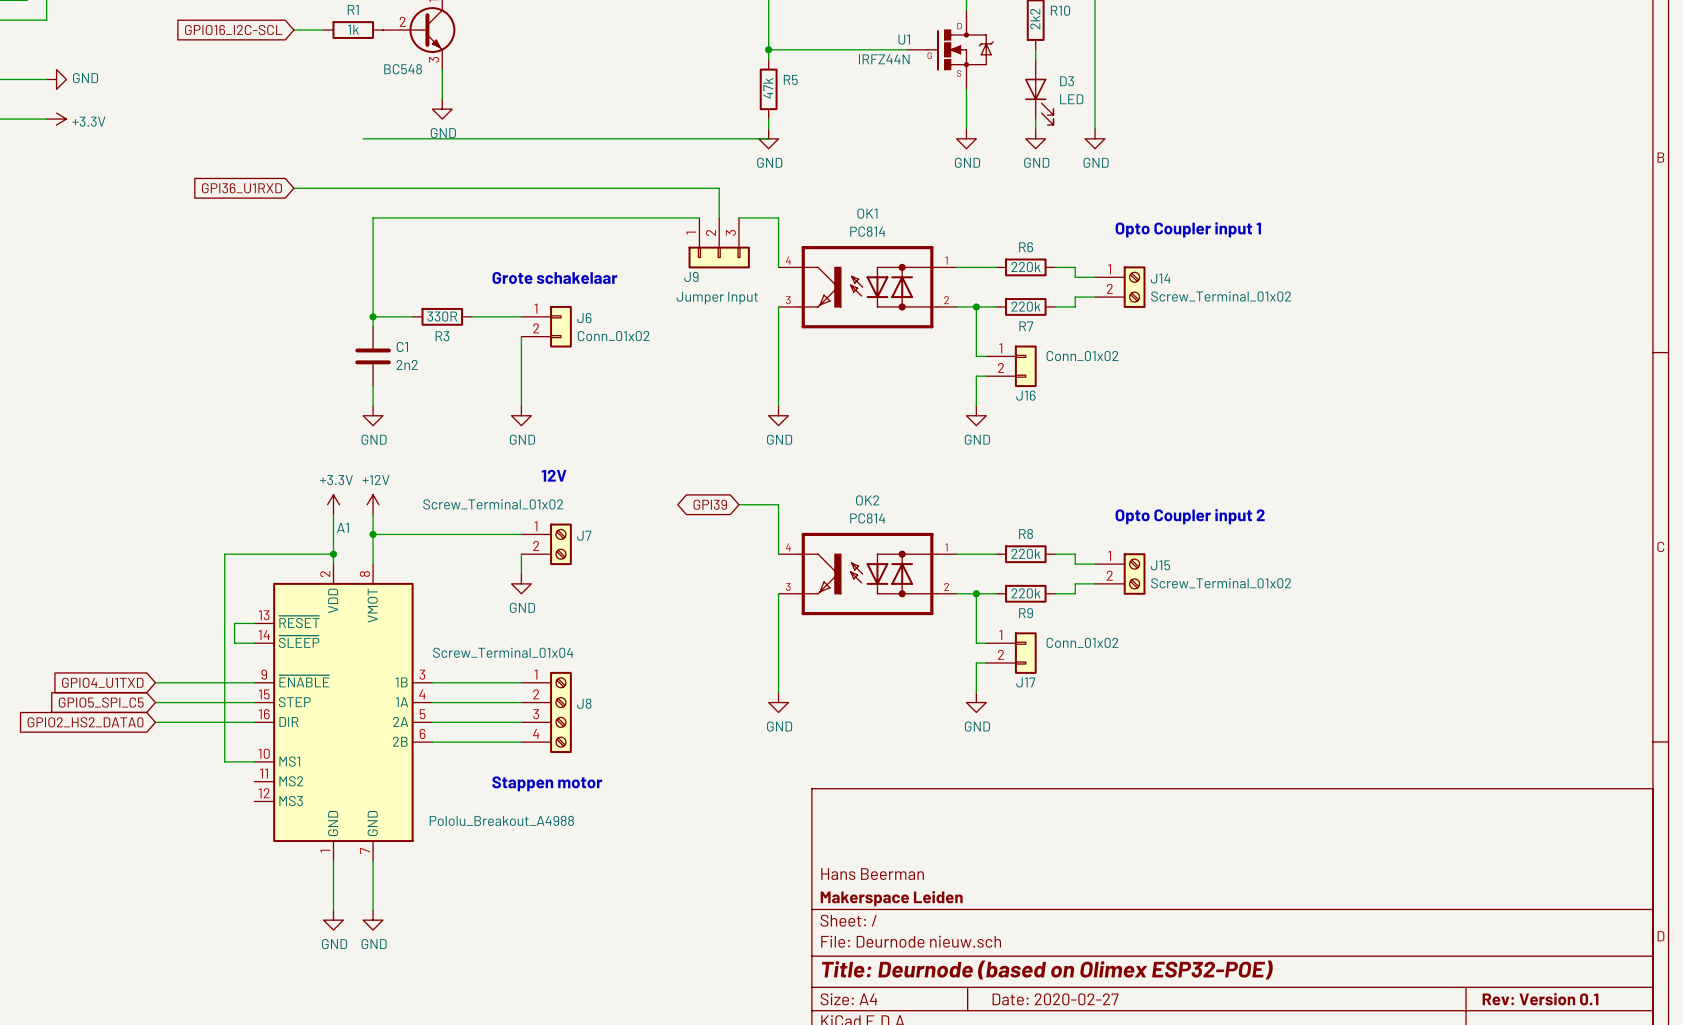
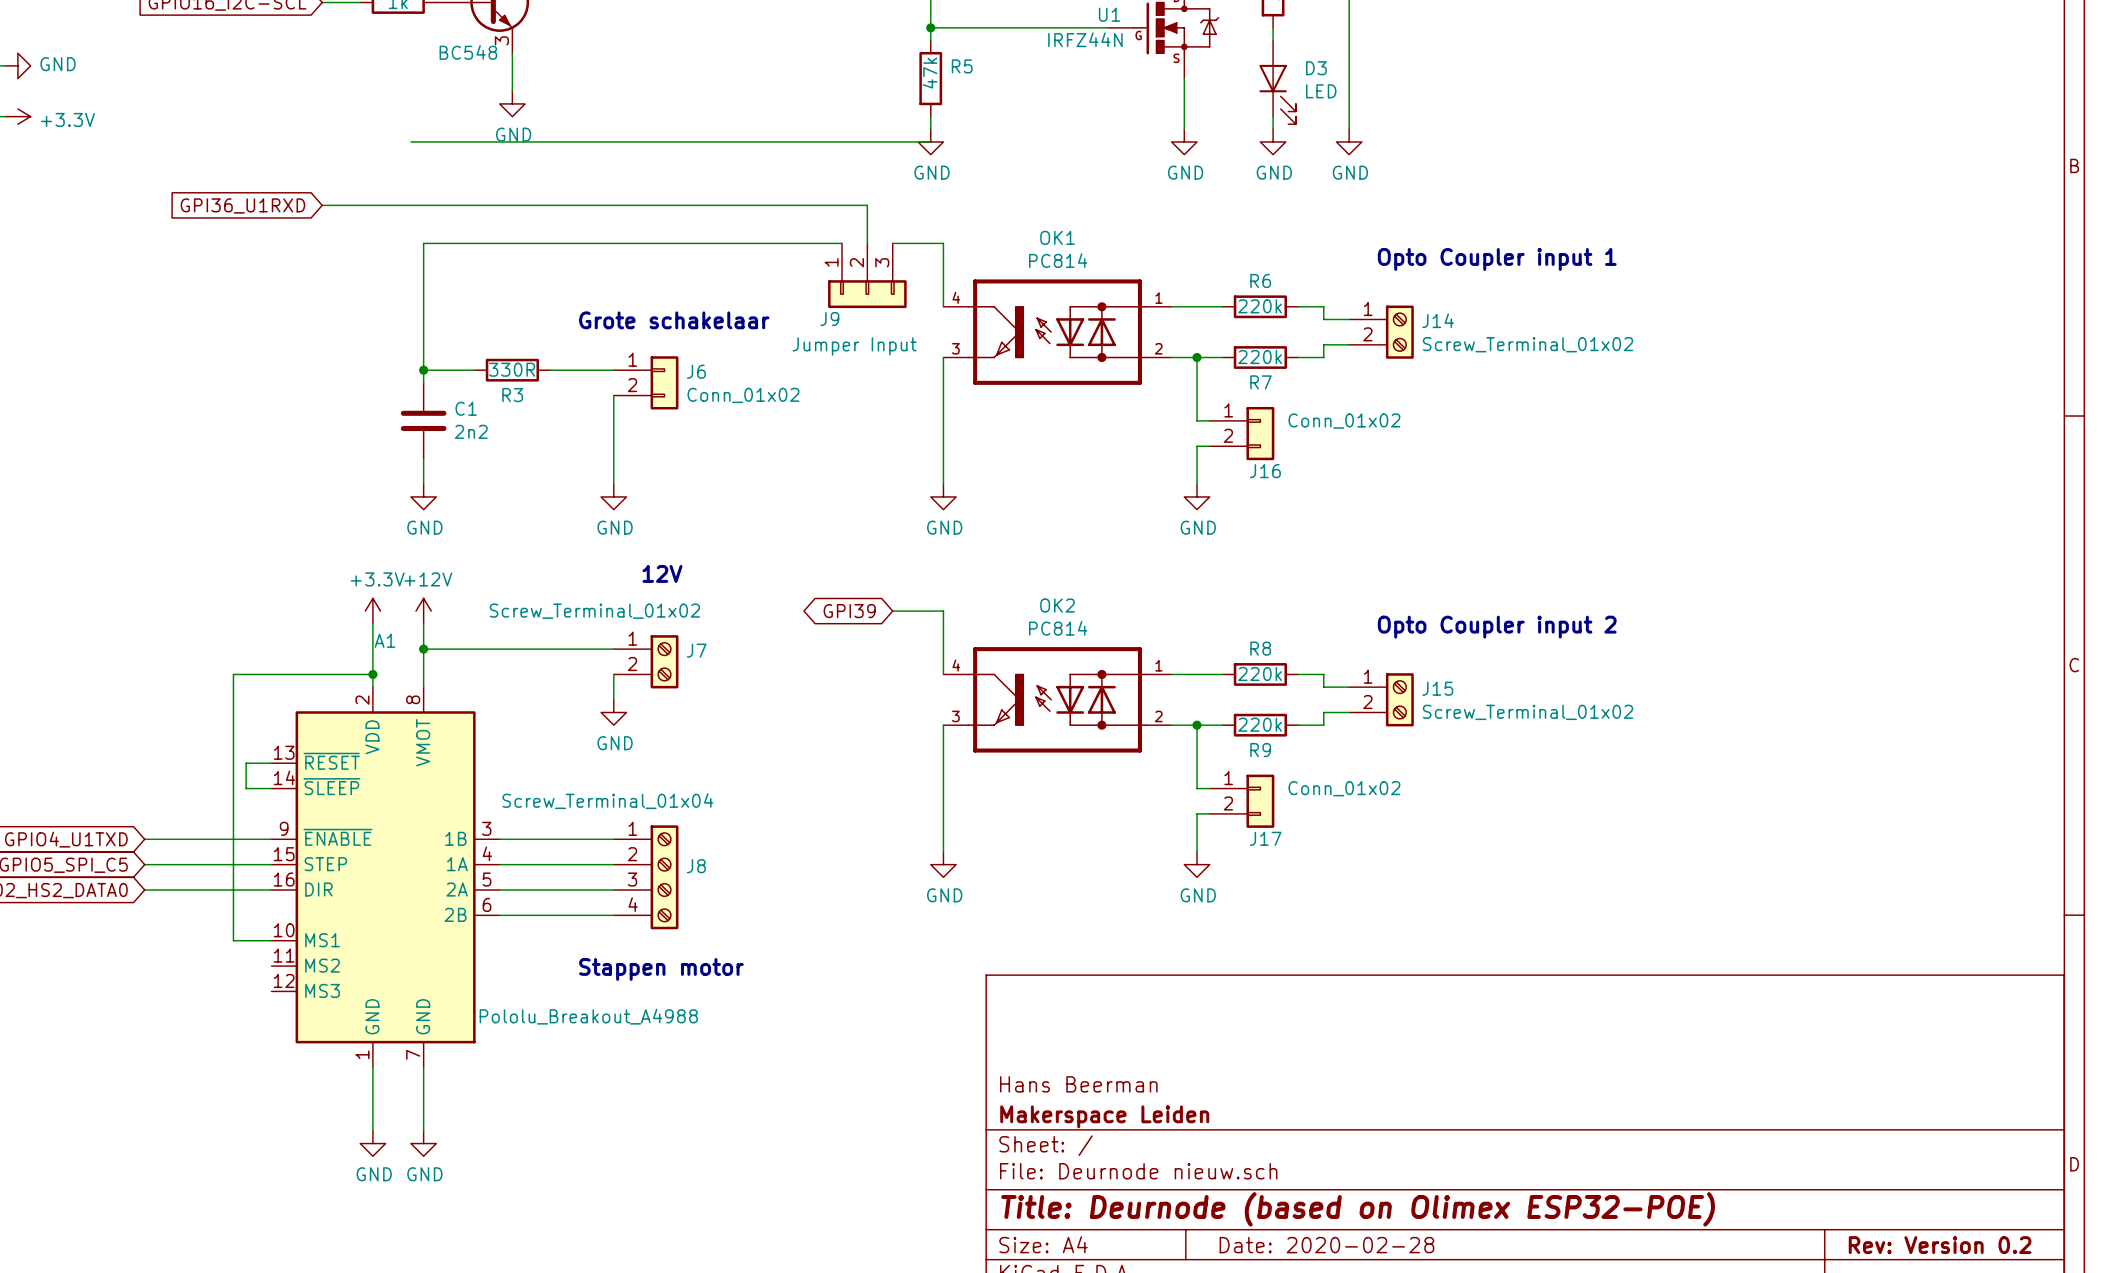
title block: Date: 2020-02-27 (1055, 999) -> Date: 2020-02-28 (1326, 1245)
title block: Rev: Version 0.1 (1540, 999) -> Rev: Version 0.2 (1940, 1245)

